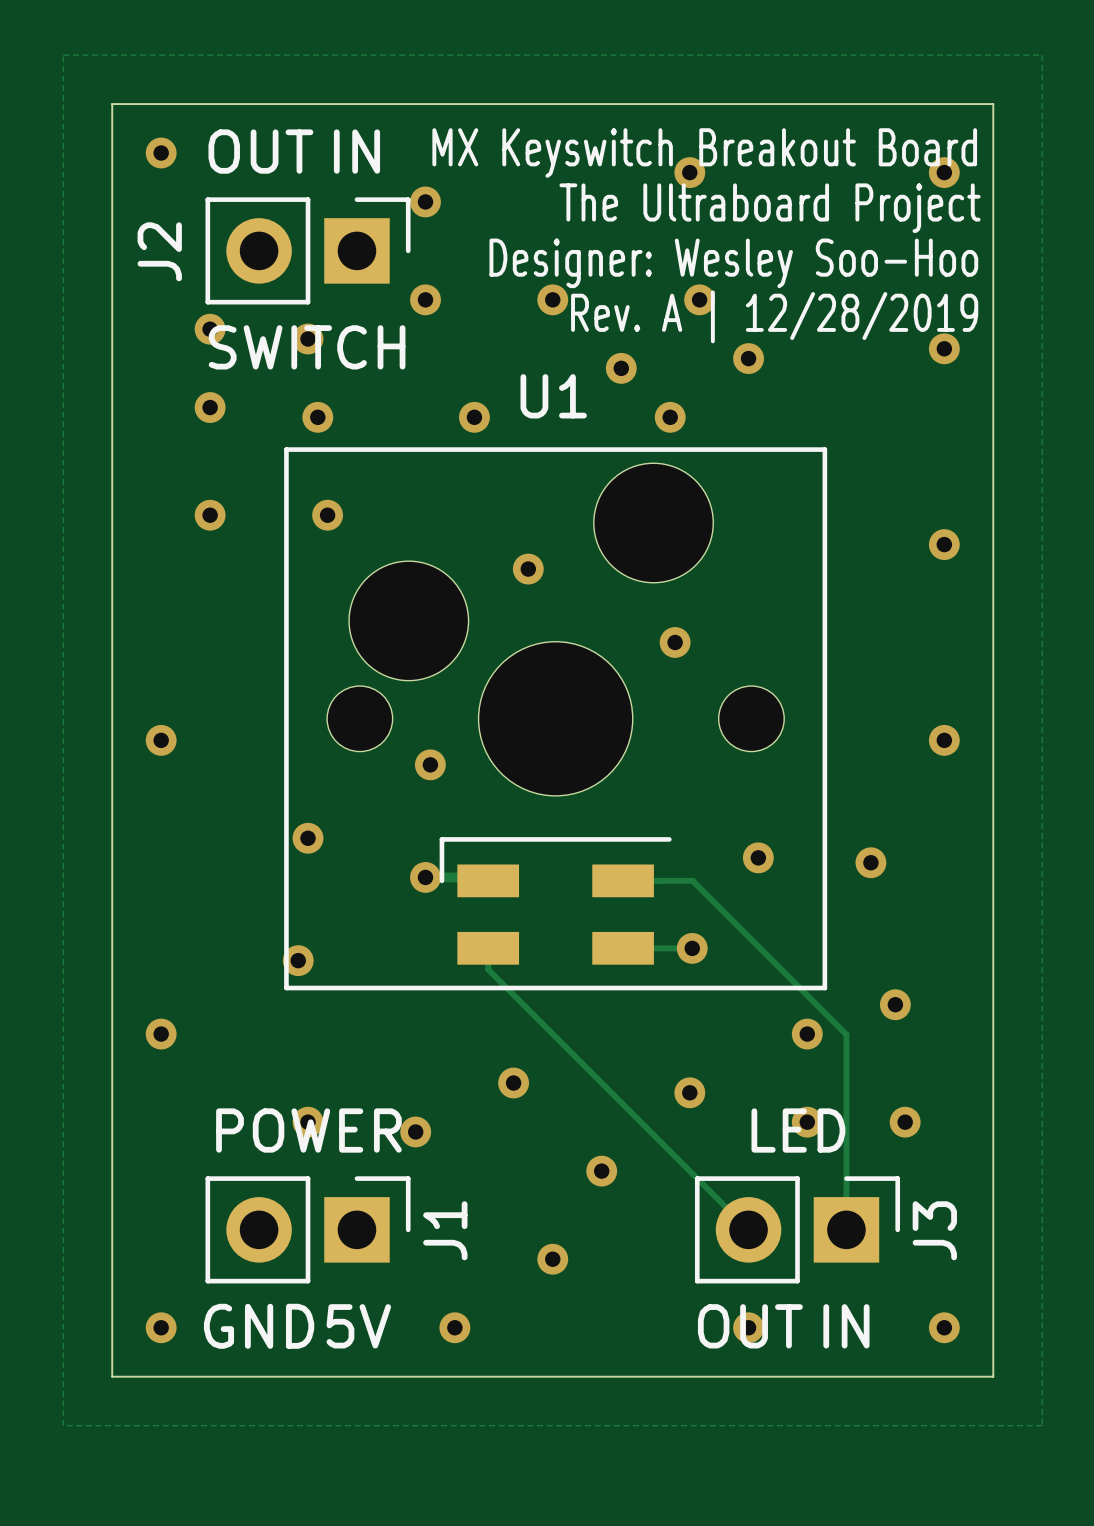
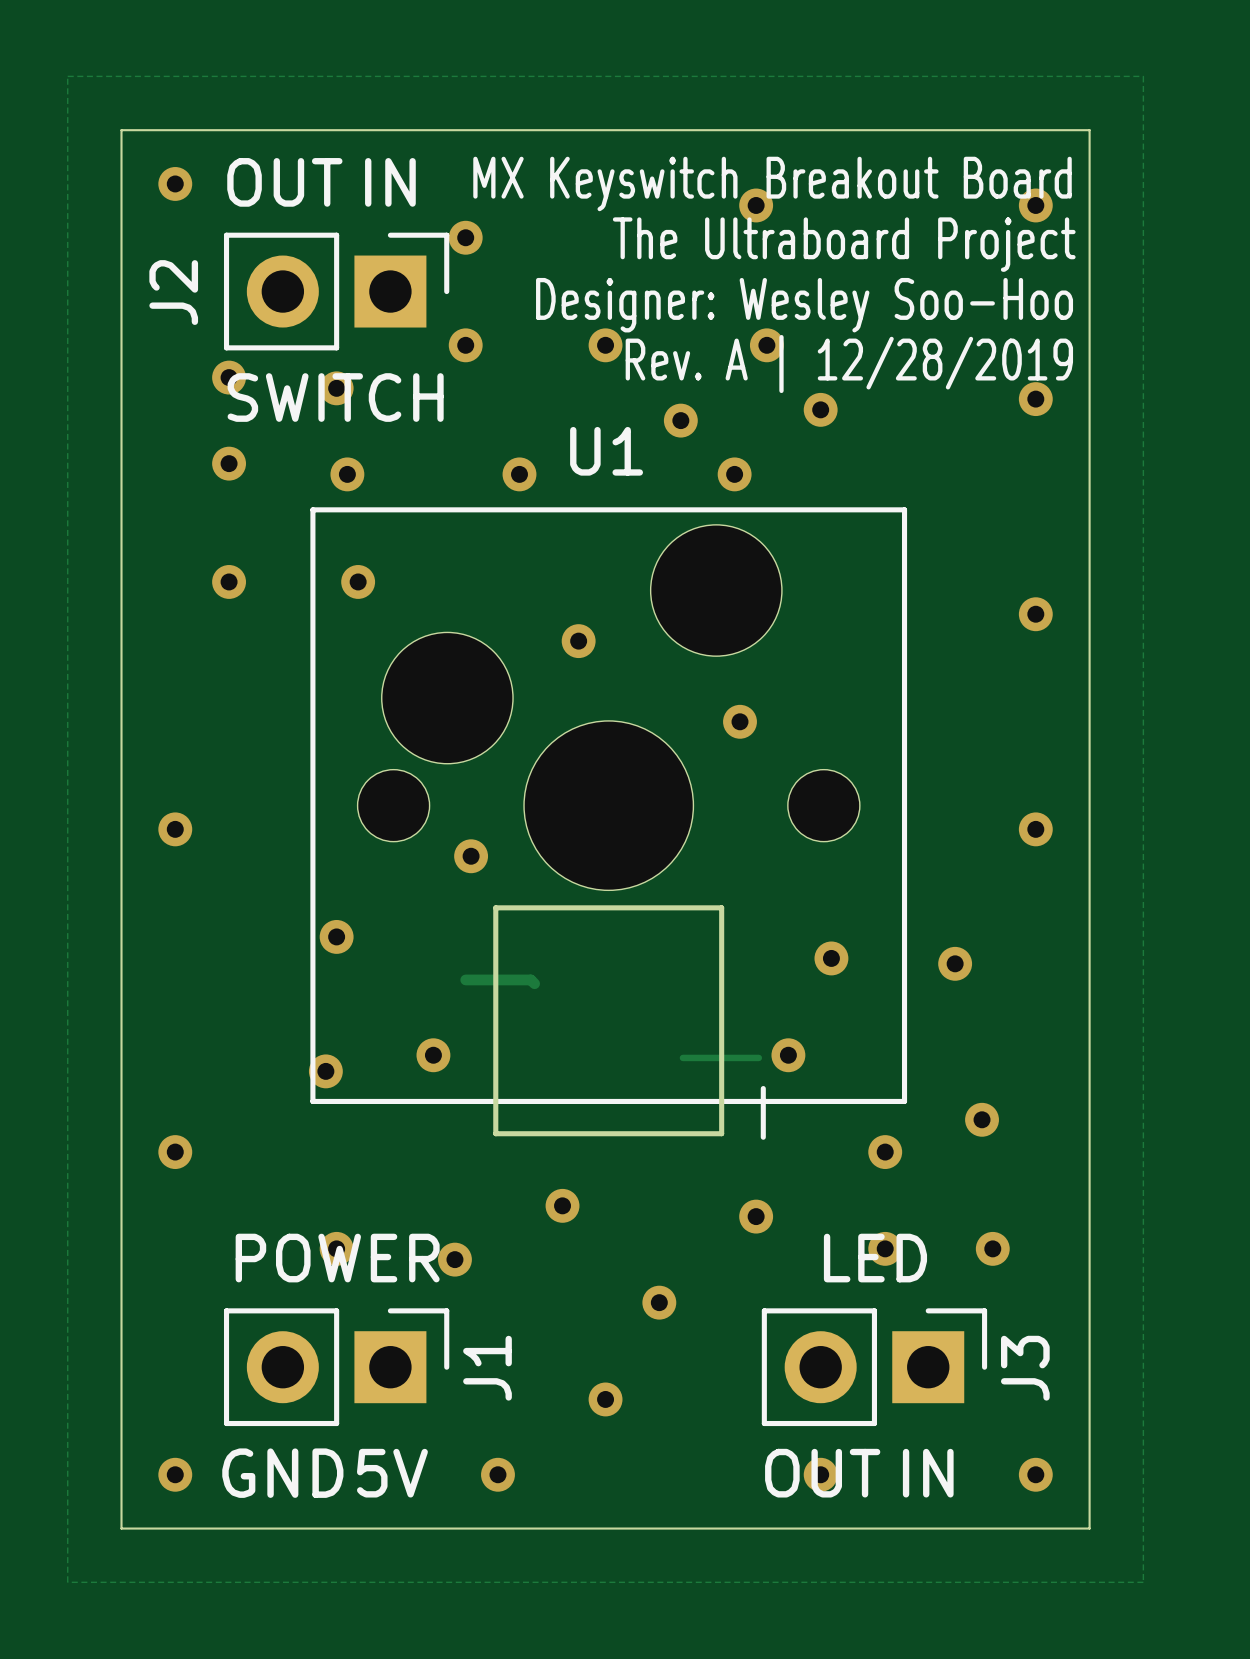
U1 footprint: [284, 447, 828, 991] -> [310, 507, 908, 1140]
via position: (425, 877) -> (433, 1055)
track: (623, 880) (692, 880) (846, 1034) (846, 1229) -> none
track: (488, 948) (488, 969) (748, 1229) -> none
via position: (692, 948) -> (788, 1055)

